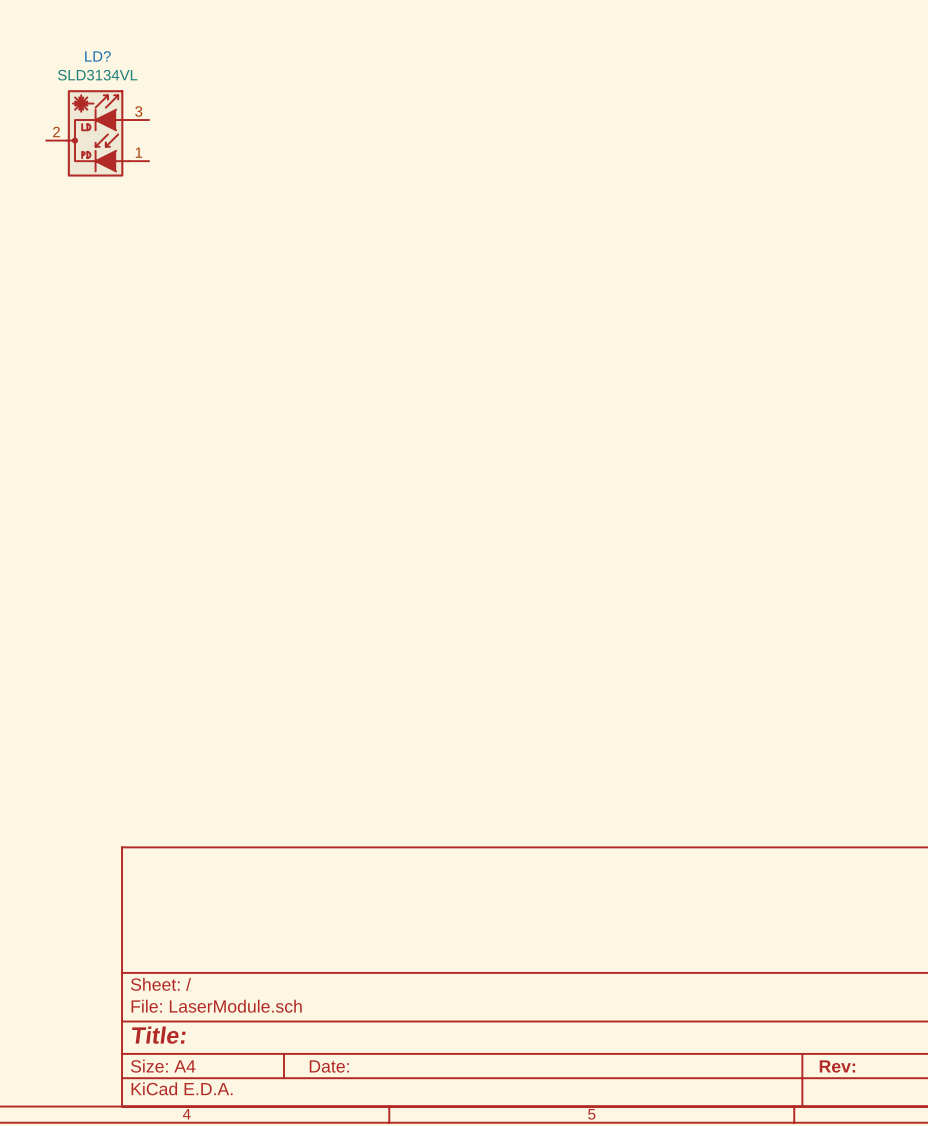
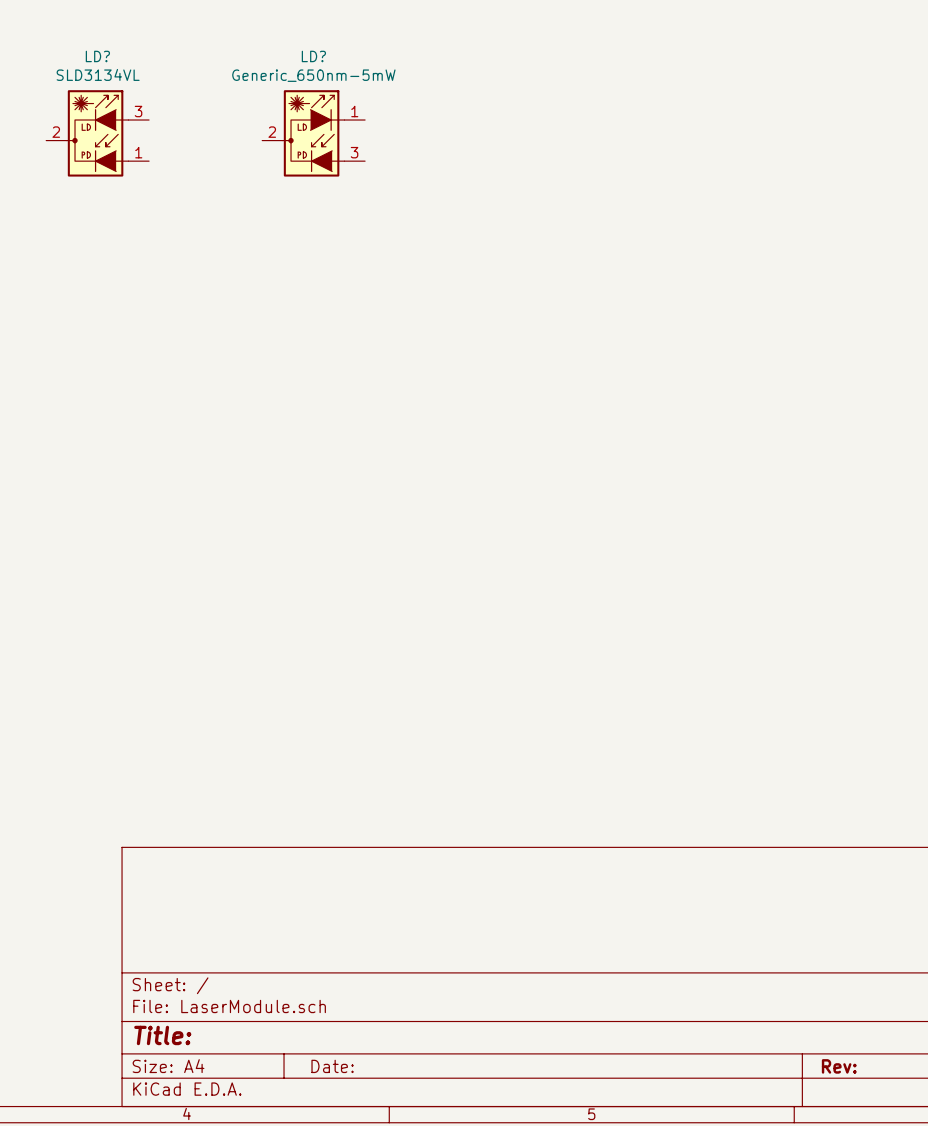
LD?: none -> Generic_650nm-5mW (313, 133)

